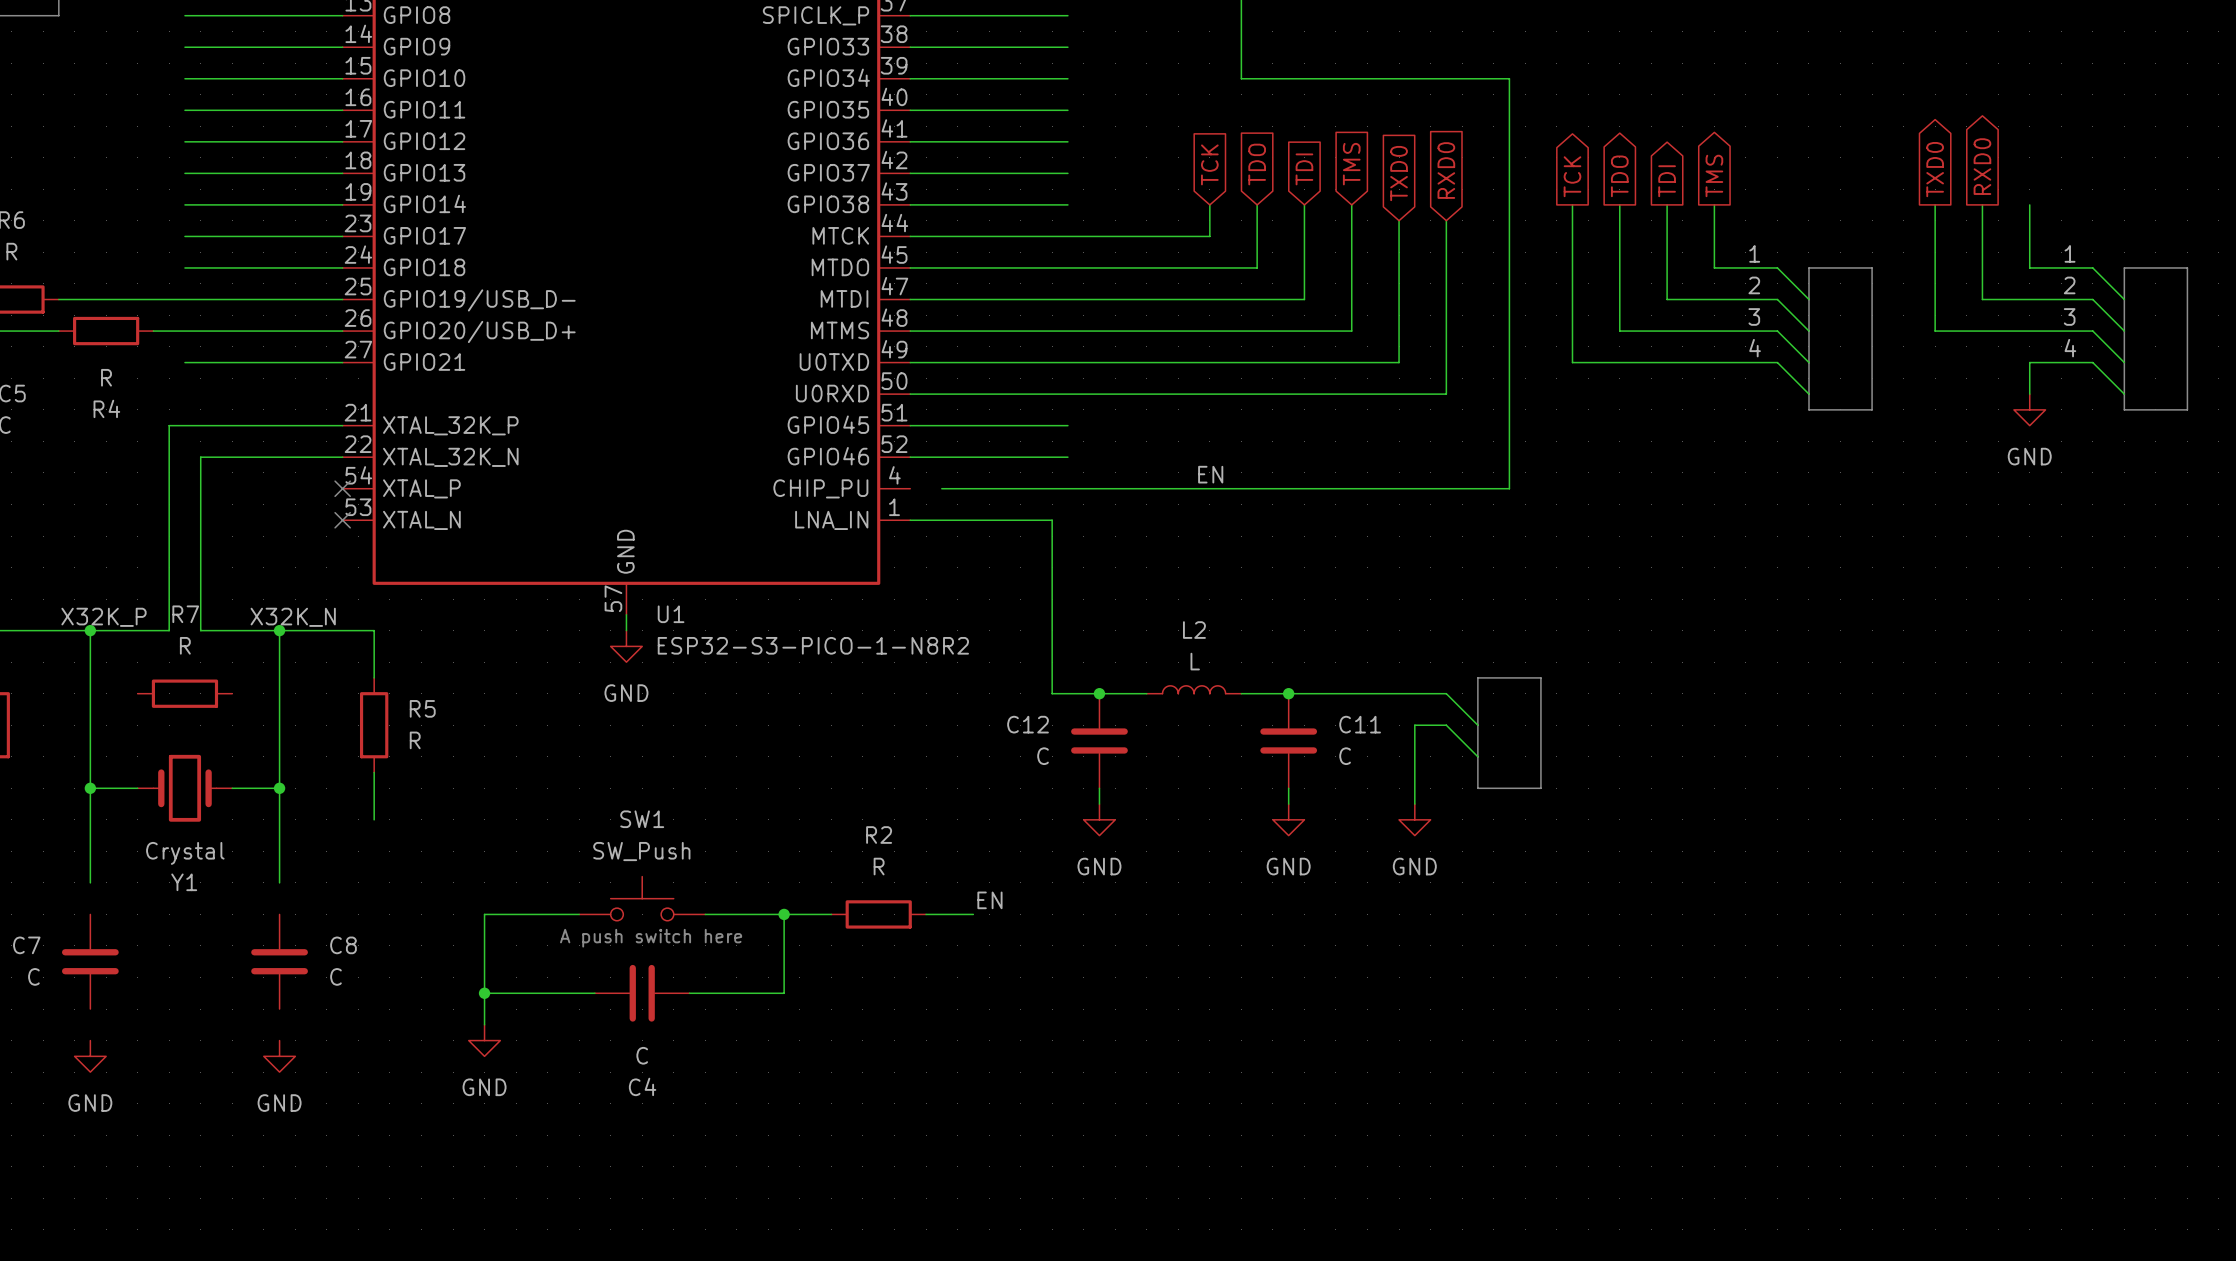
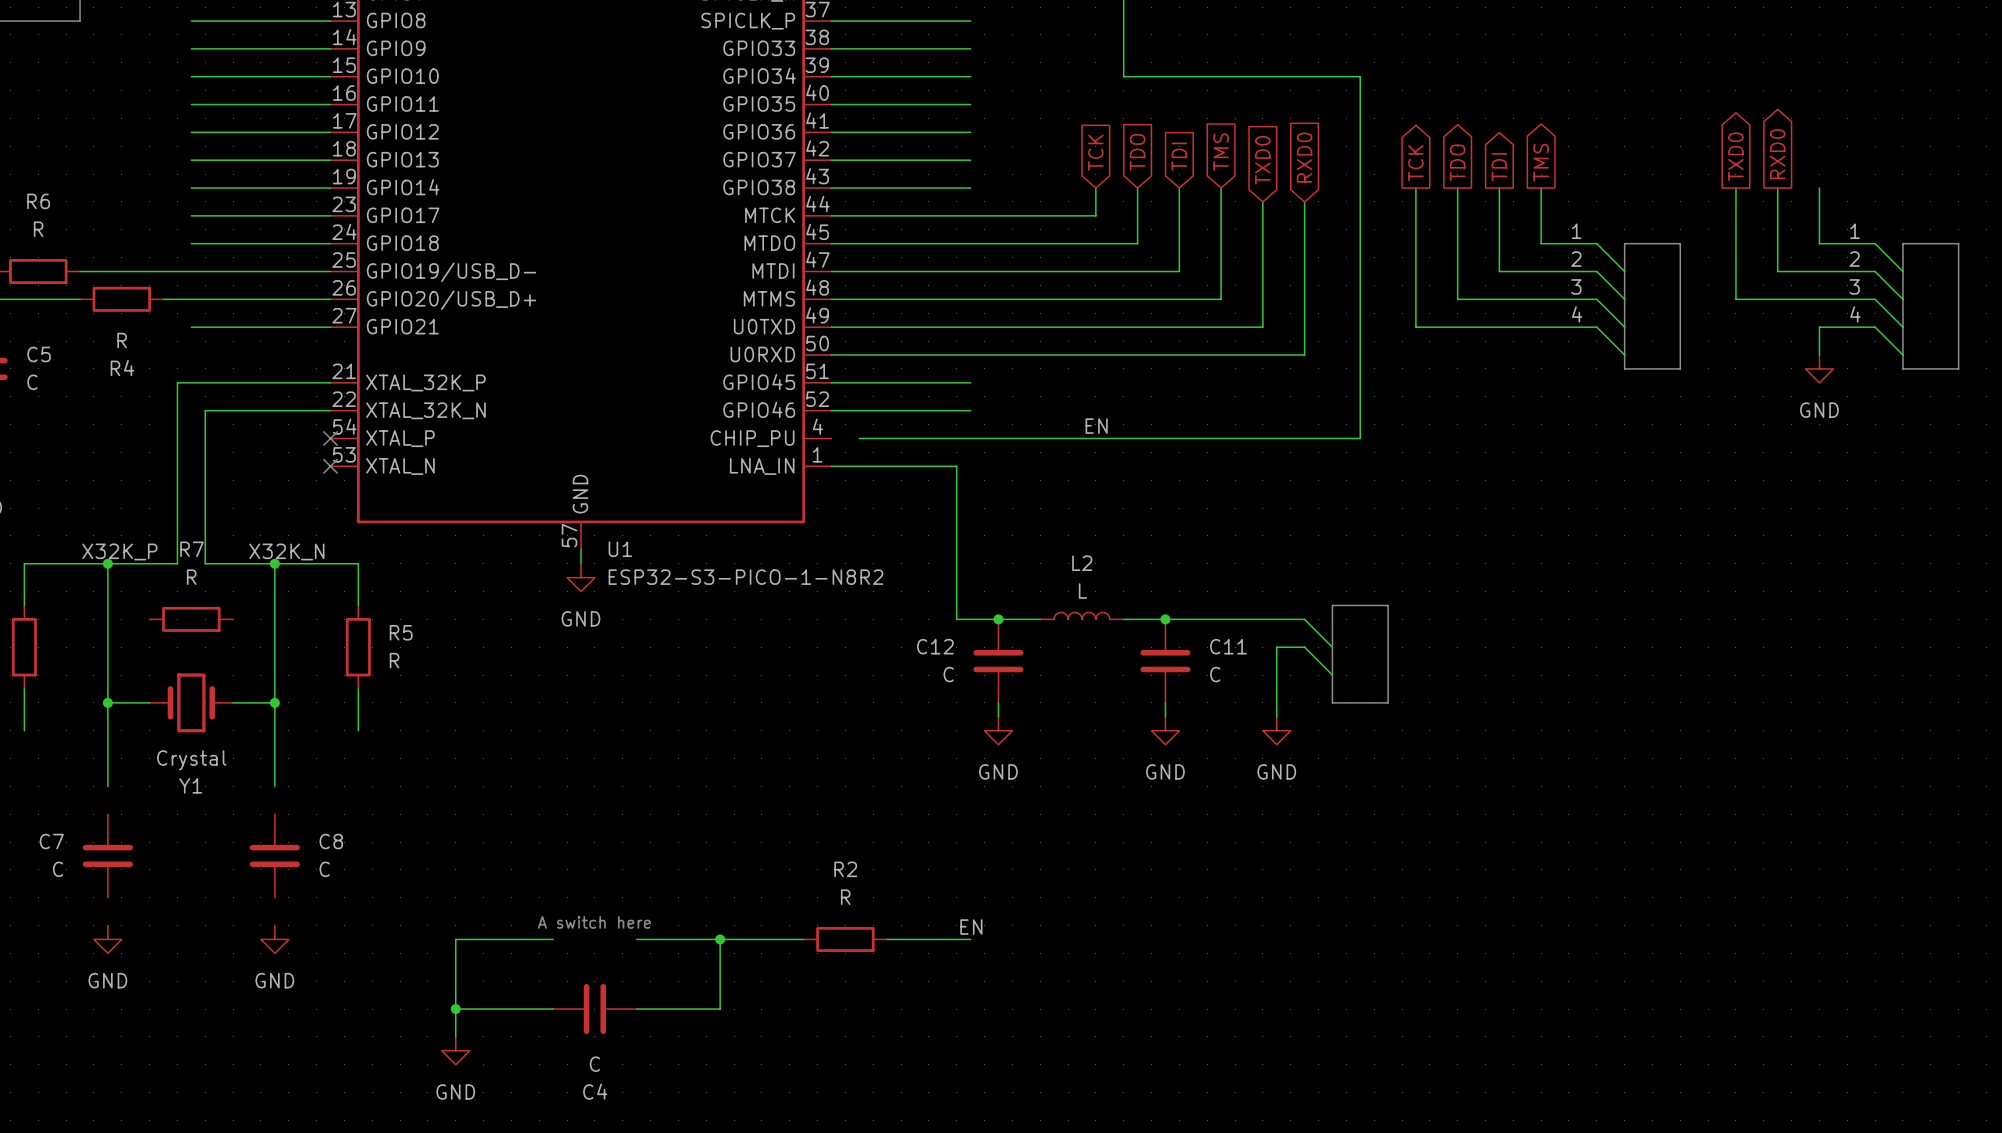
SW1: SW_Push (642, 898) -> none
label position: EN (989, 900) -> EN (971, 927)
wire: (579, 914) (484, 914) (484, 1024) -> none
wire: (705, 914) (831, 914) -> none
wire: (784, 914) (784, 993) (689, 993) -> (720, 939) (720, 1009) (636, 1009)
junction: (784, 914) -> none
R2 position: (878, 914) -> (845, 939)
wire: (926, 914) (973, 914) -> none
text: A push switch here (651, 938) -> none
wire: (484, 993) (594, 993) -> (455, 1009) (553, 1009)
junction: (484, 993) -> none
C4 position: (642, 993) -> (594, 1009)
text: none -> A switch here (594, 922)
power symbol position: GND (484, 1040) -> GND (455, 1050)
wire: none -> (553, 939) (455, 939) (455, 1036)
wire: none -> (636, 939) (803, 939)
junction: none -> (720, 939)
wire: none -> (887, 939) (970, 939)
junction: none -> (455, 1009)

